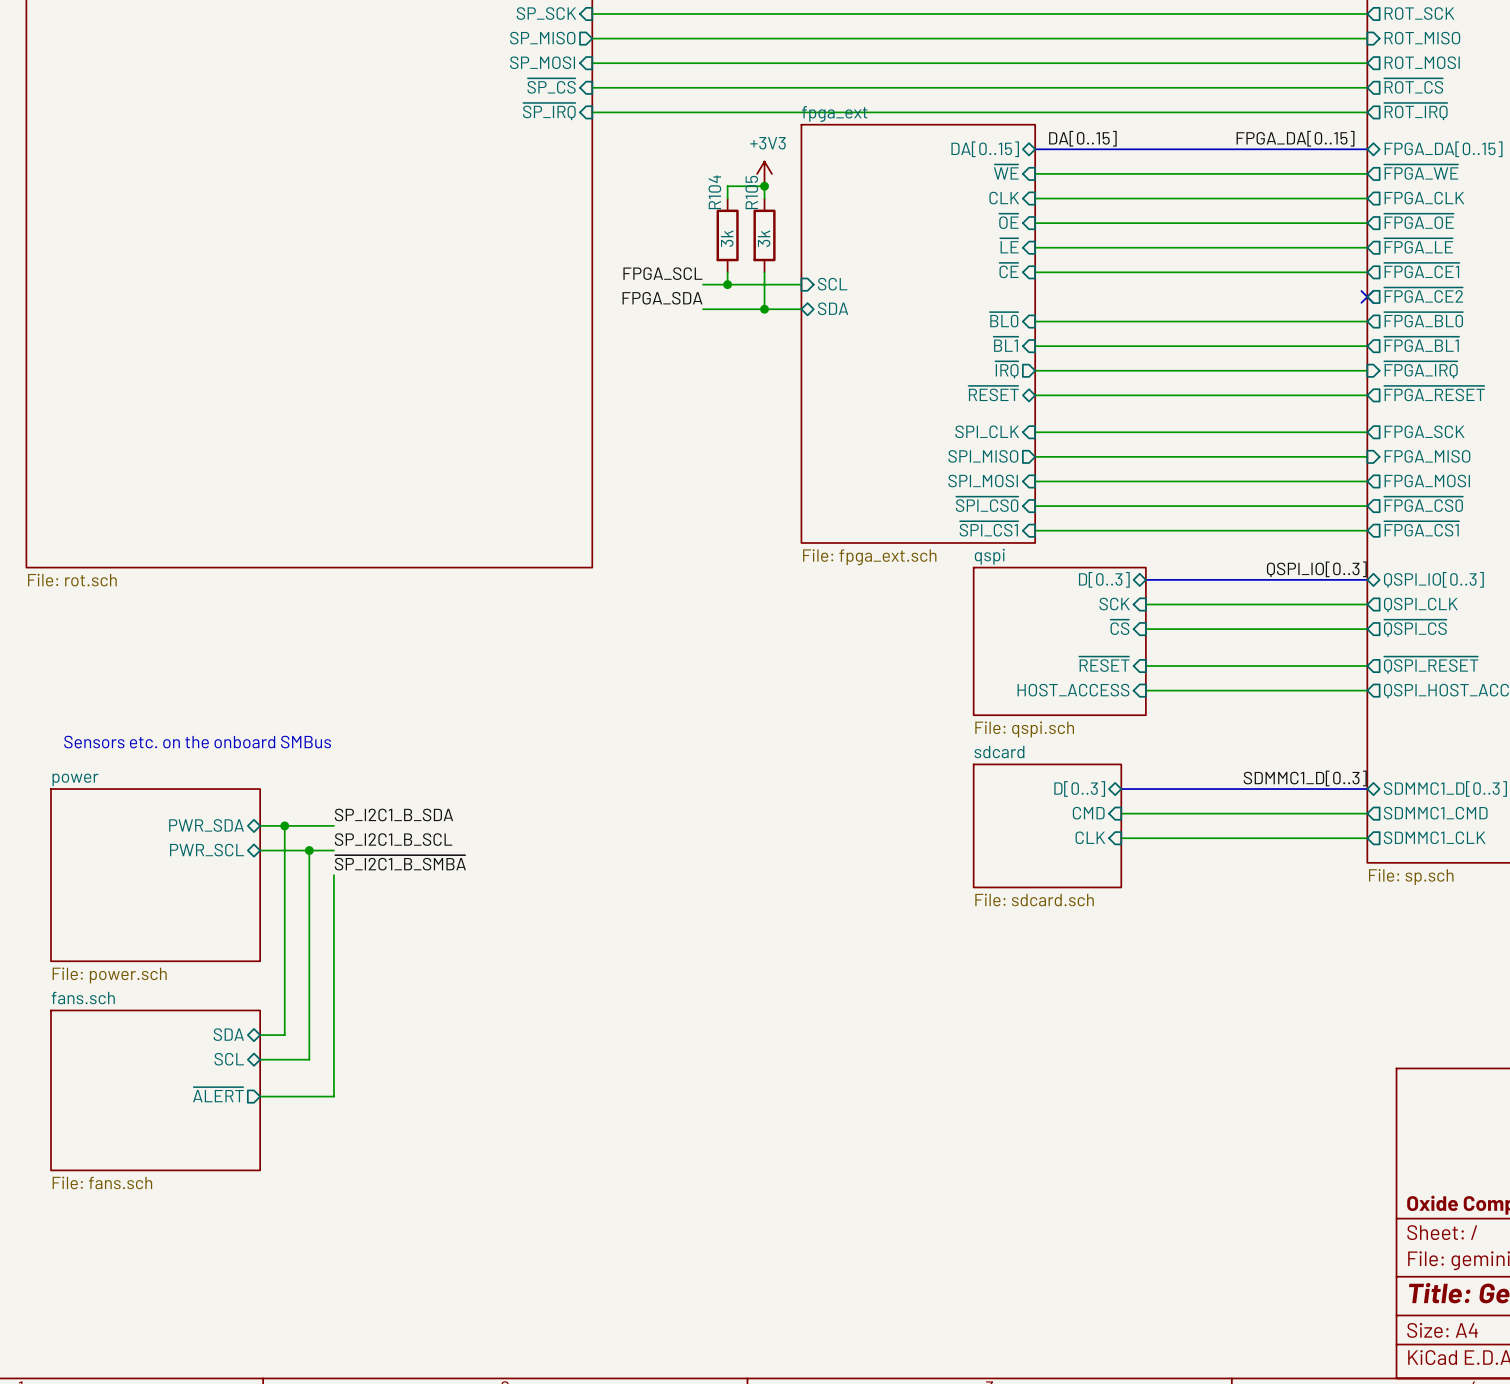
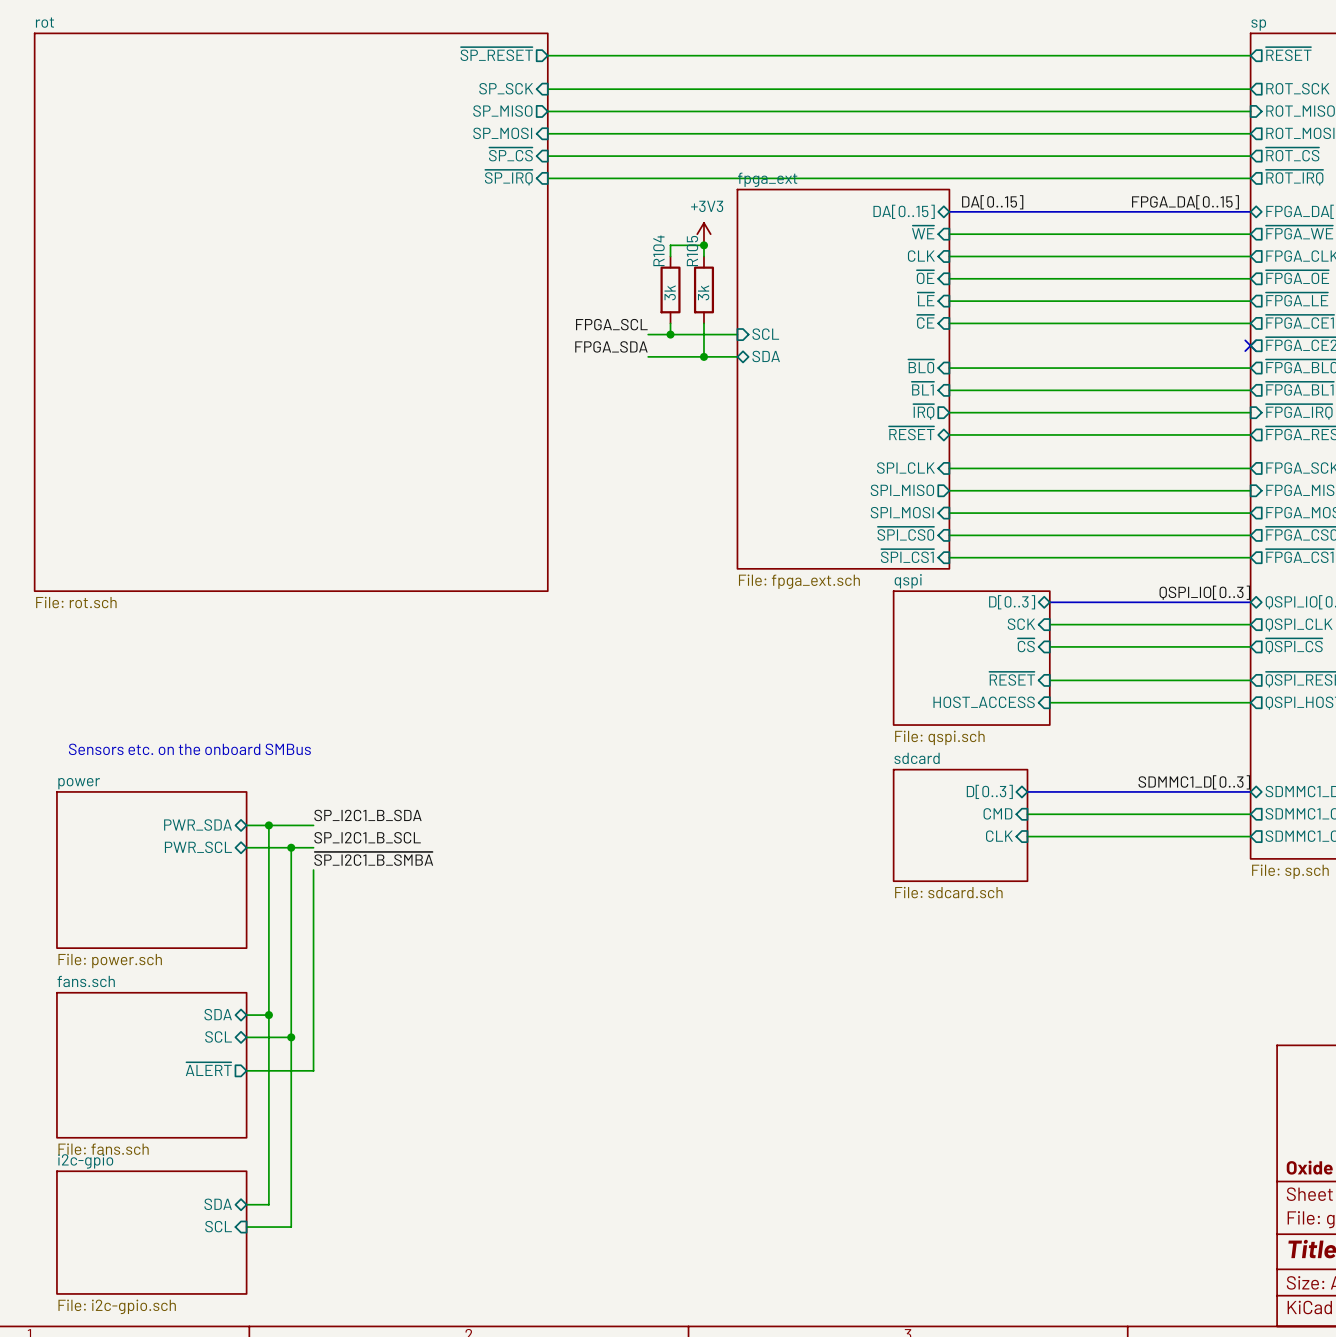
wire: none -> (268, 1015) (268, 1204) (246, 1204)
junction: none -> (268, 1015)
wire: none -> (291, 1037) (291, 1227) (246, 1227)
junction: none -> (291, 1037)
sheet pin: none -> SDA (218, 1204)
sheet pin: none -> SCL (218, 1226)
sheet i2c-gpio: none -> File: i2c-gpio.sch (151, 1232)

